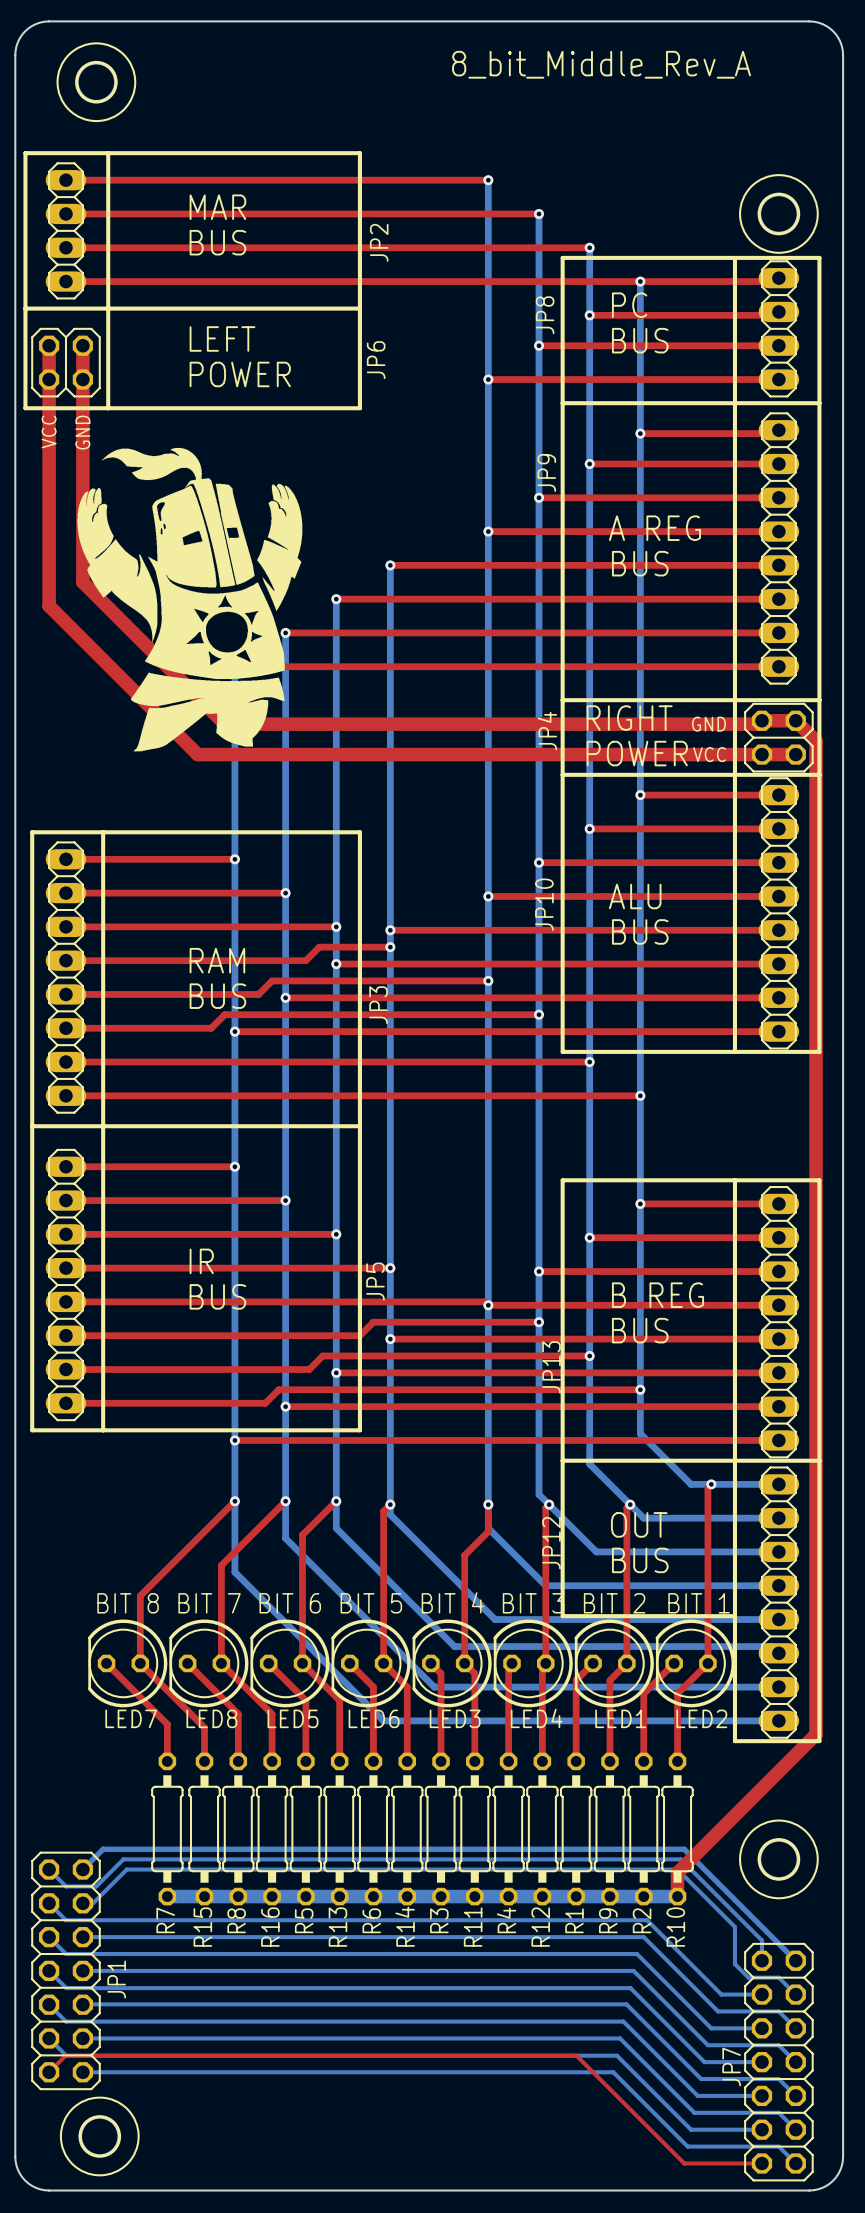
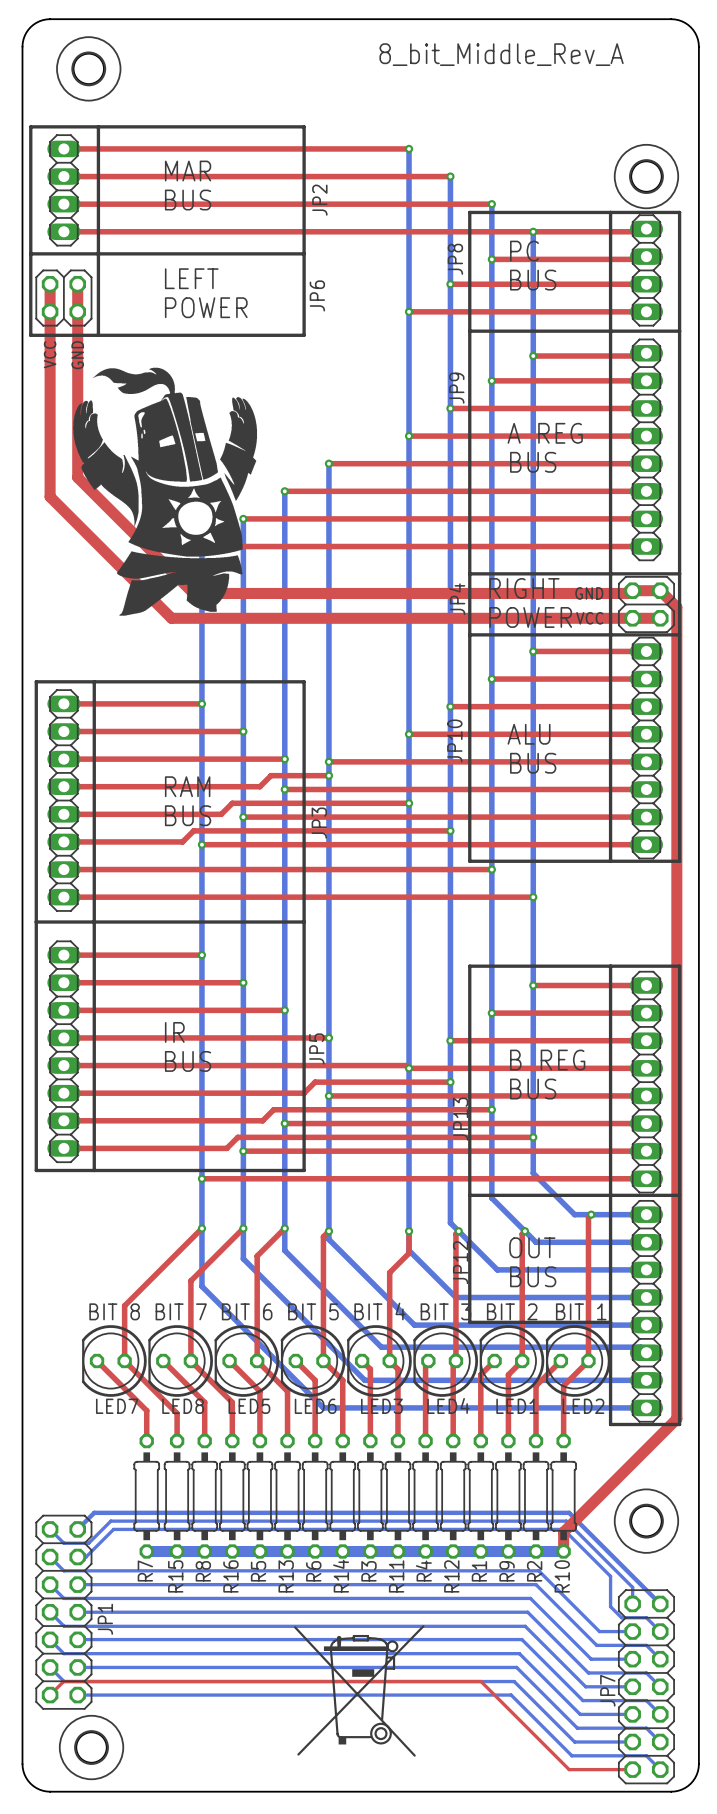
drawing: none -> [294, 1625, 425, 1757]

